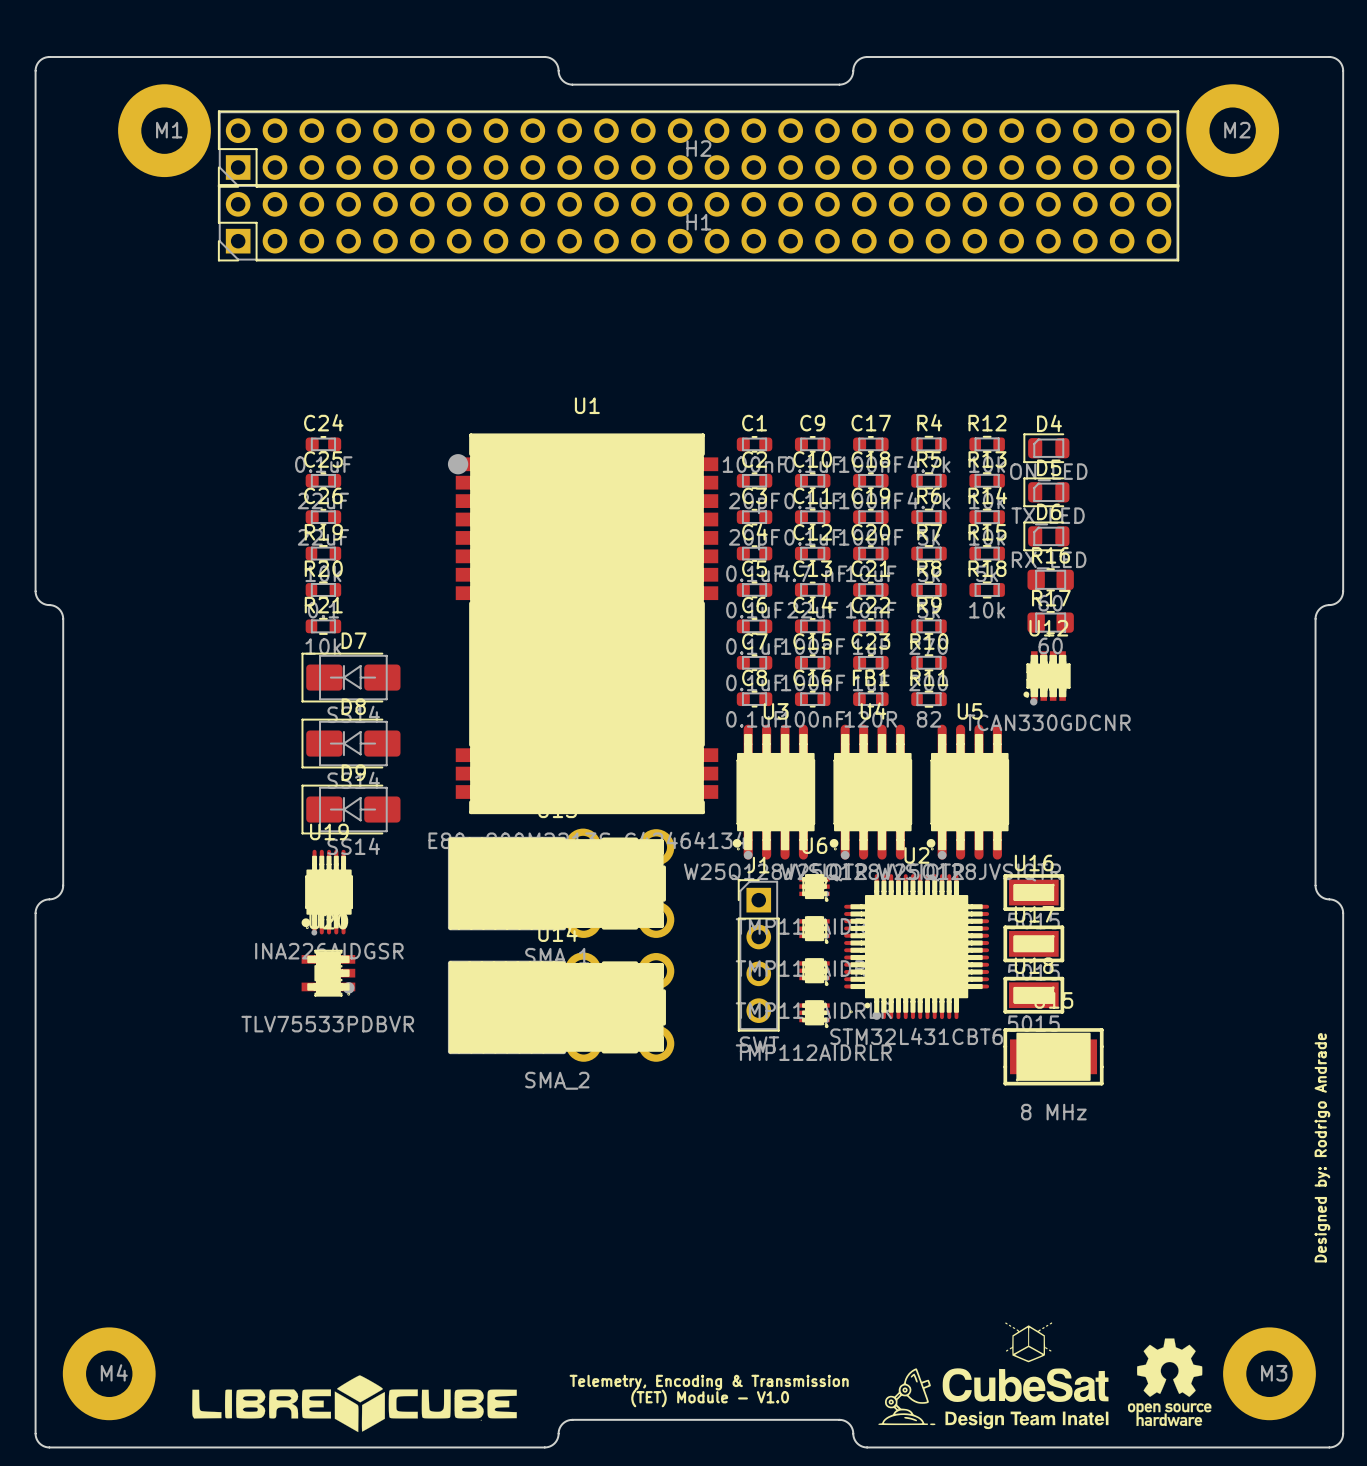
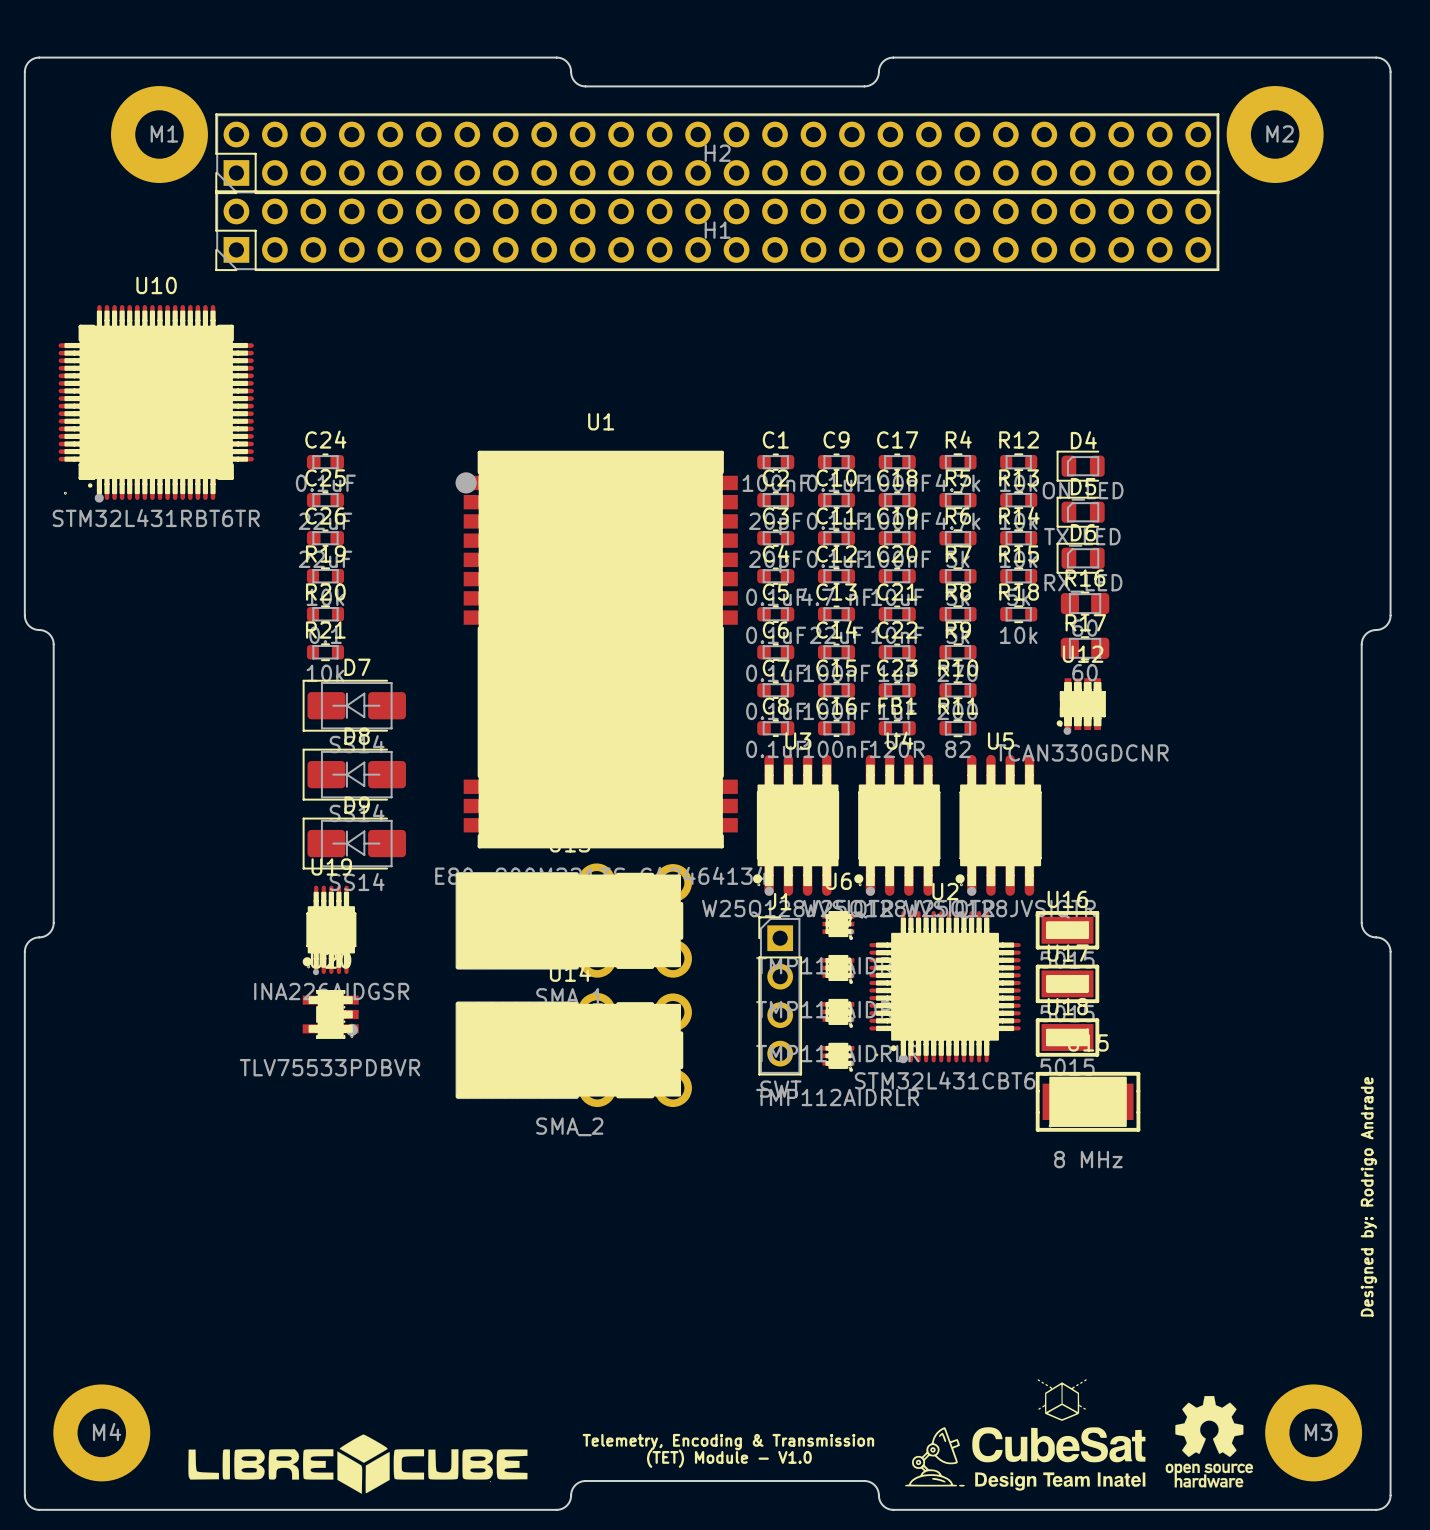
U10: none -> STM32L431RBT6TR (156, 403)

